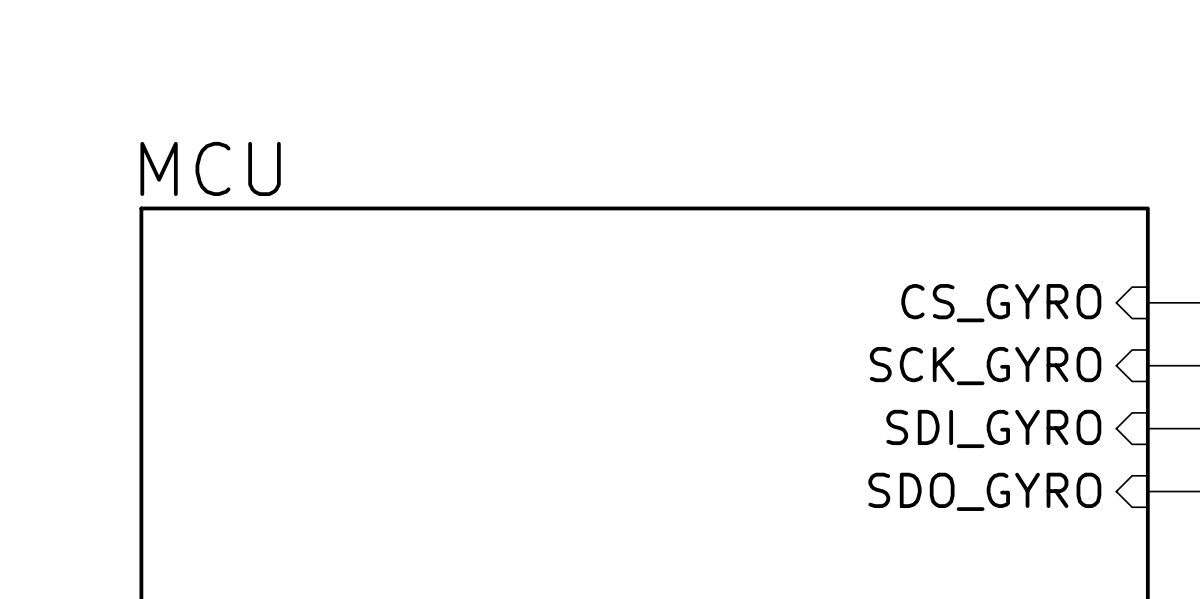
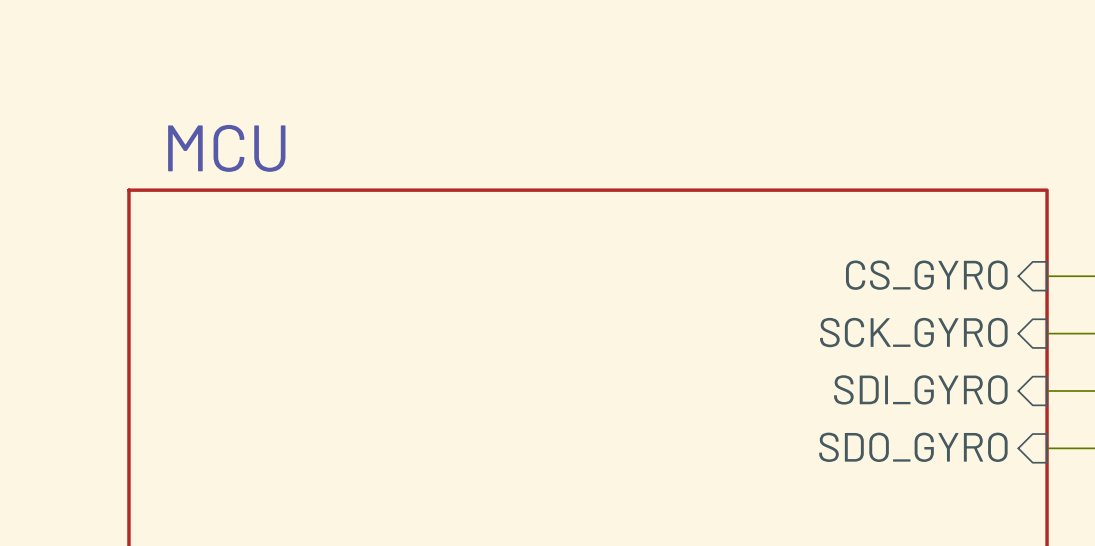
text position: MCU (210, 168) -> MCU (226, 148)

